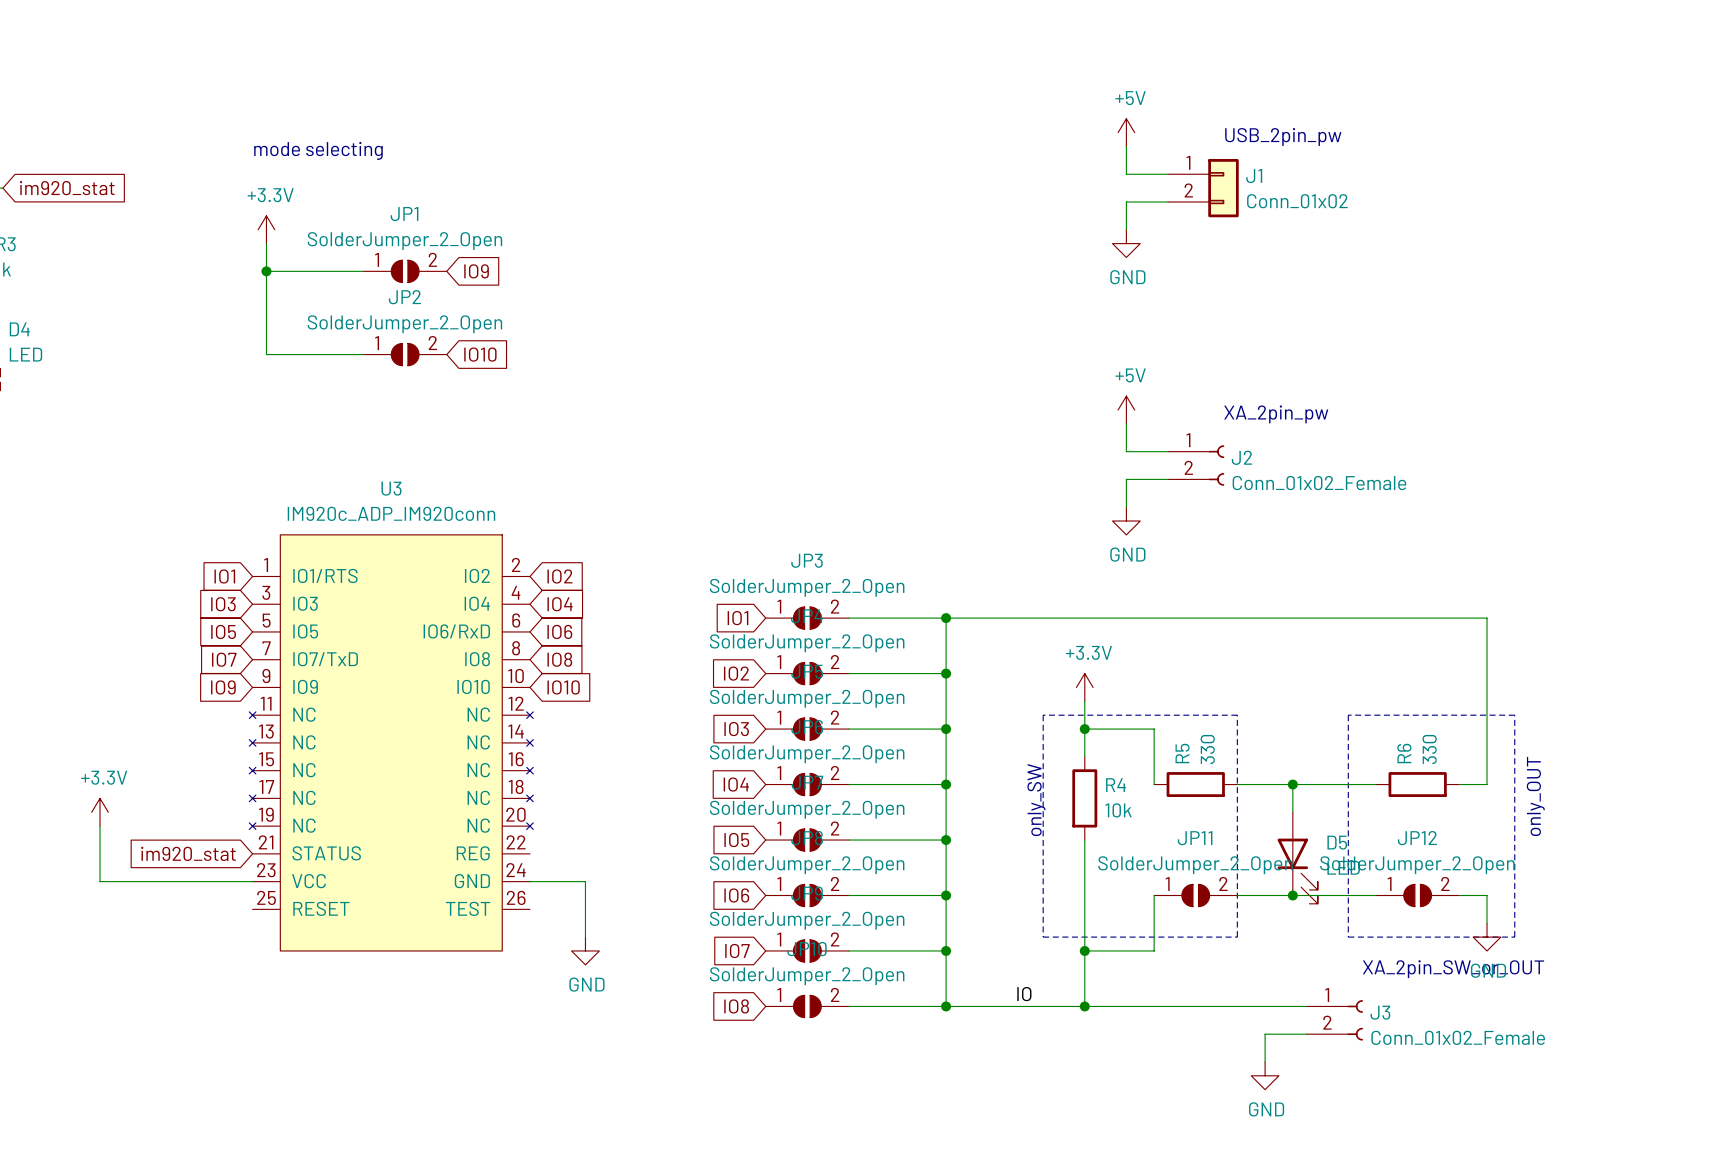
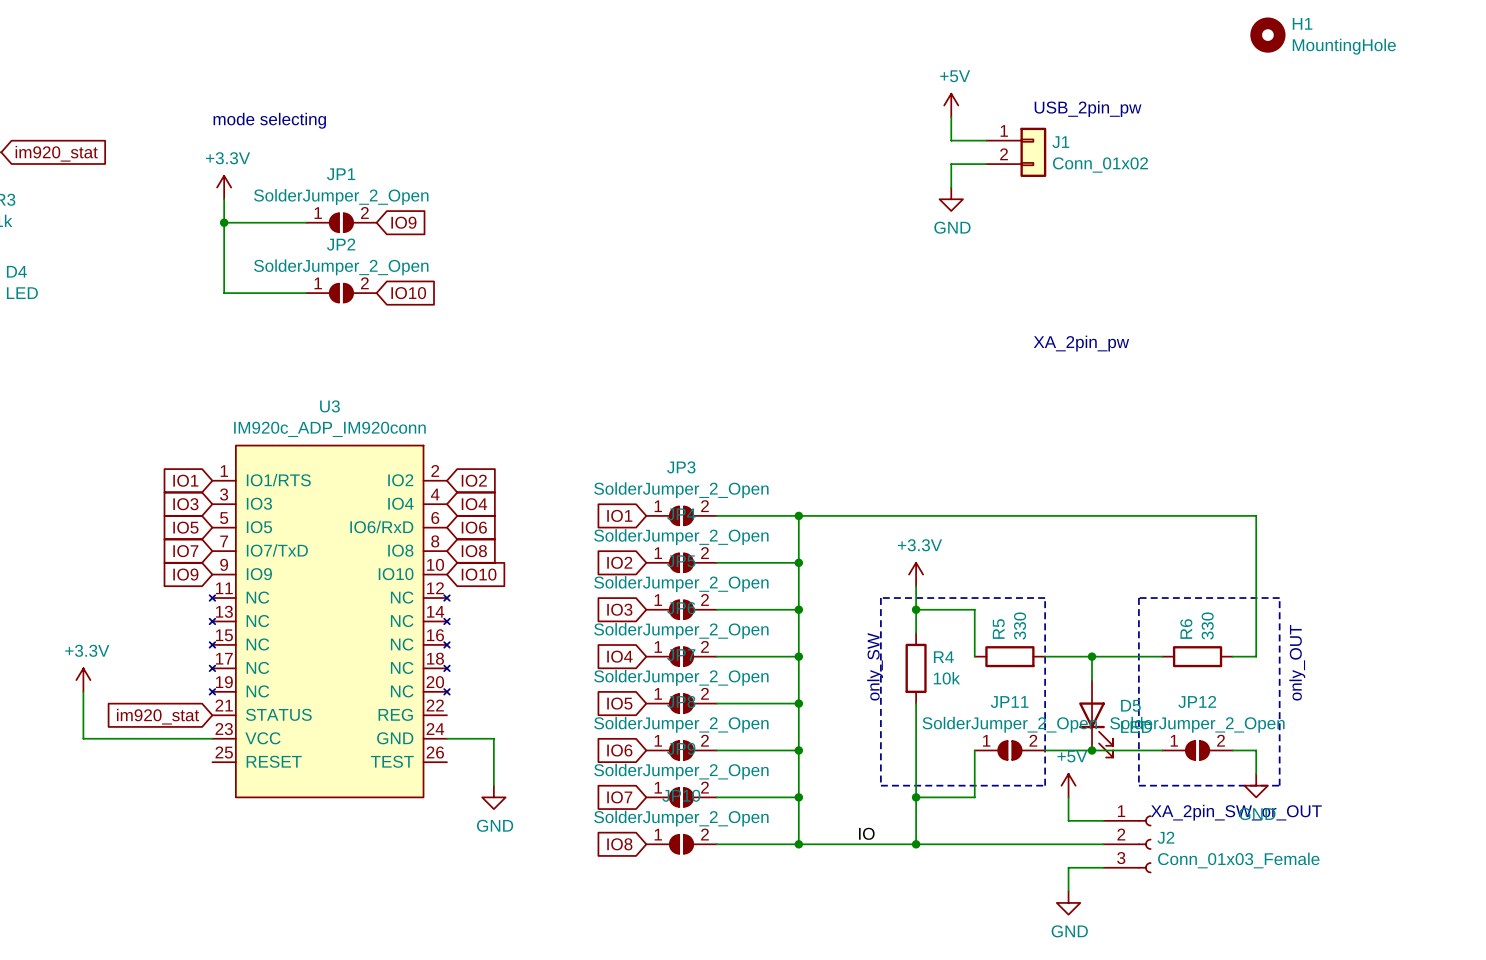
H1: none -> MountingHole (1267, 35)
power symbol: +5V (1126, 410) -> none
wire: (1126, 423) (1126, 451) (1168, 451) -> none
J2 symbol: [1168, 445, 1225, 486] -> [1103, 815, 1152, 874]
wire: (1168, 479) (1126, 479) (1126, 507) -> none
J2 value: Conn_01x02_Female (1319, 483) -> Conn_01x03_Female (1238, 860)
power symbol: GND (1126, 521) -> none
power symbol: none -> +5V (1068, 785)
wire: none -> (1068, 797) (1068, 820) (1103, 820)
J3: Conn_01x02_Female (1334, 1020) -> none

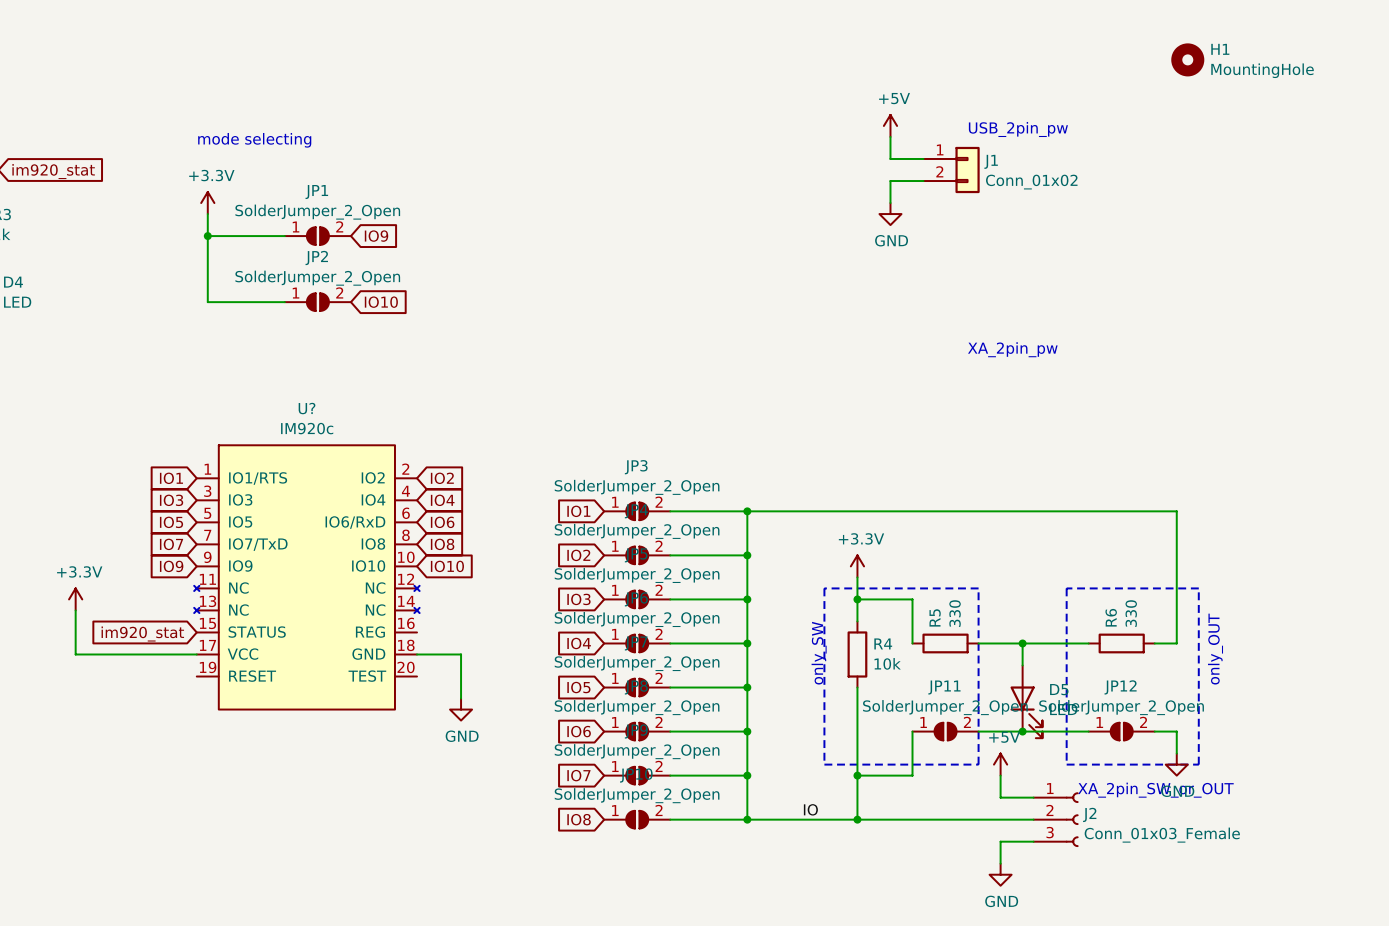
U?: none -> IM920c (306, 577)
U3: IM920c_ADP_IM920conn (329, 621) -> none
power symbol position: +3.3V (83, 680) -> +3.3V (75, 599)
wire: (83, 691) (83, 738) (212, 738) -> (75, 610) (75, 654) (196, 654)
global label position: im920_stat (158, 716) -> im920_stat (142, 634)
wire: (446, 738) (493, 738) (493, 785) -> (417, 654) (461, 654) (461, 698)
power symbol position: GND (493, 797) -> GND (461, 709)

